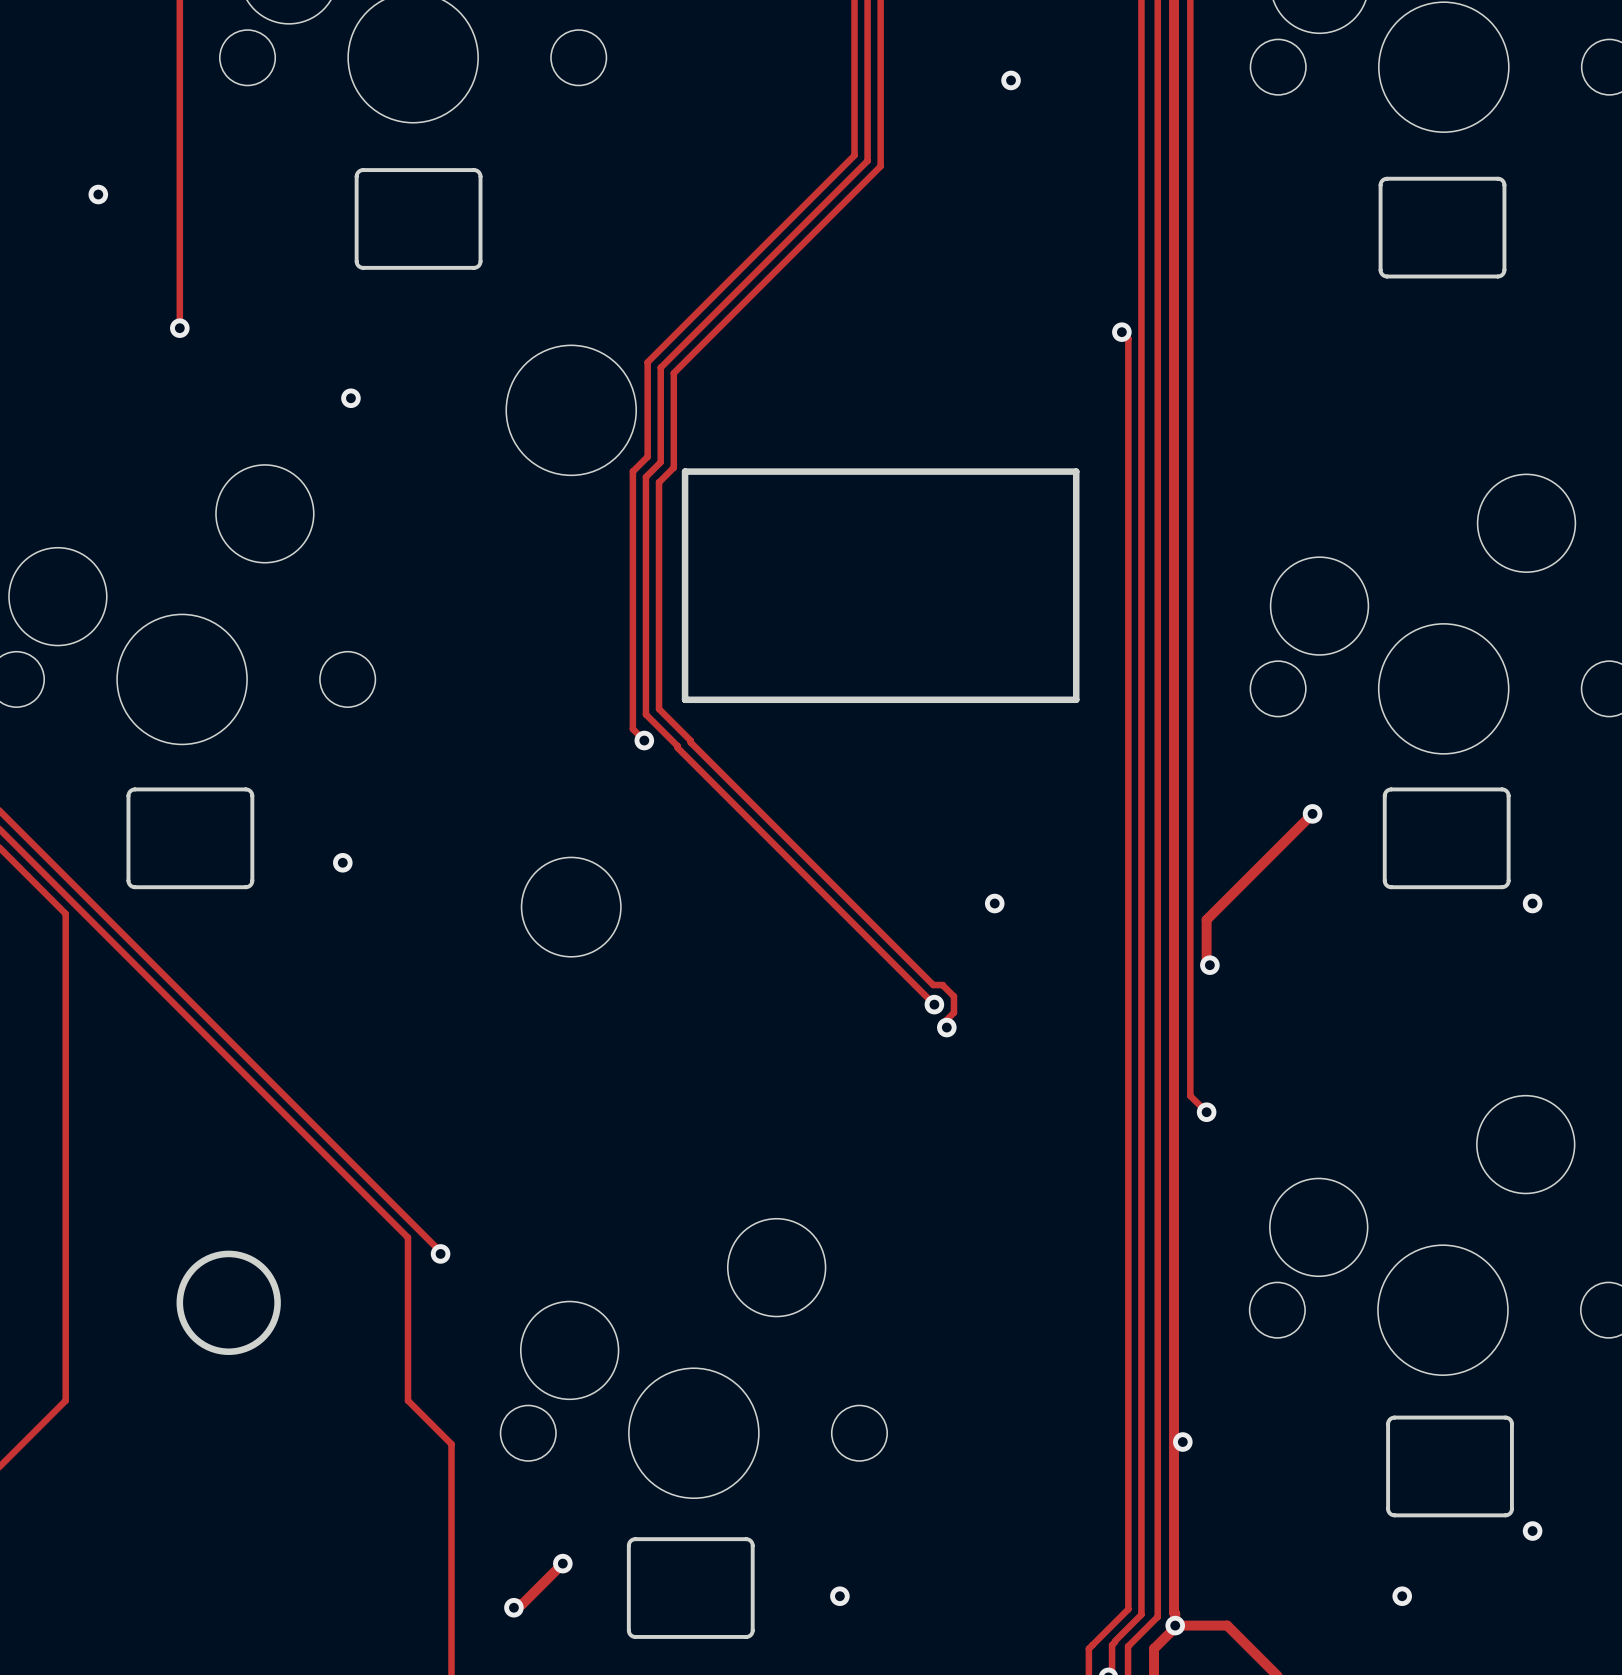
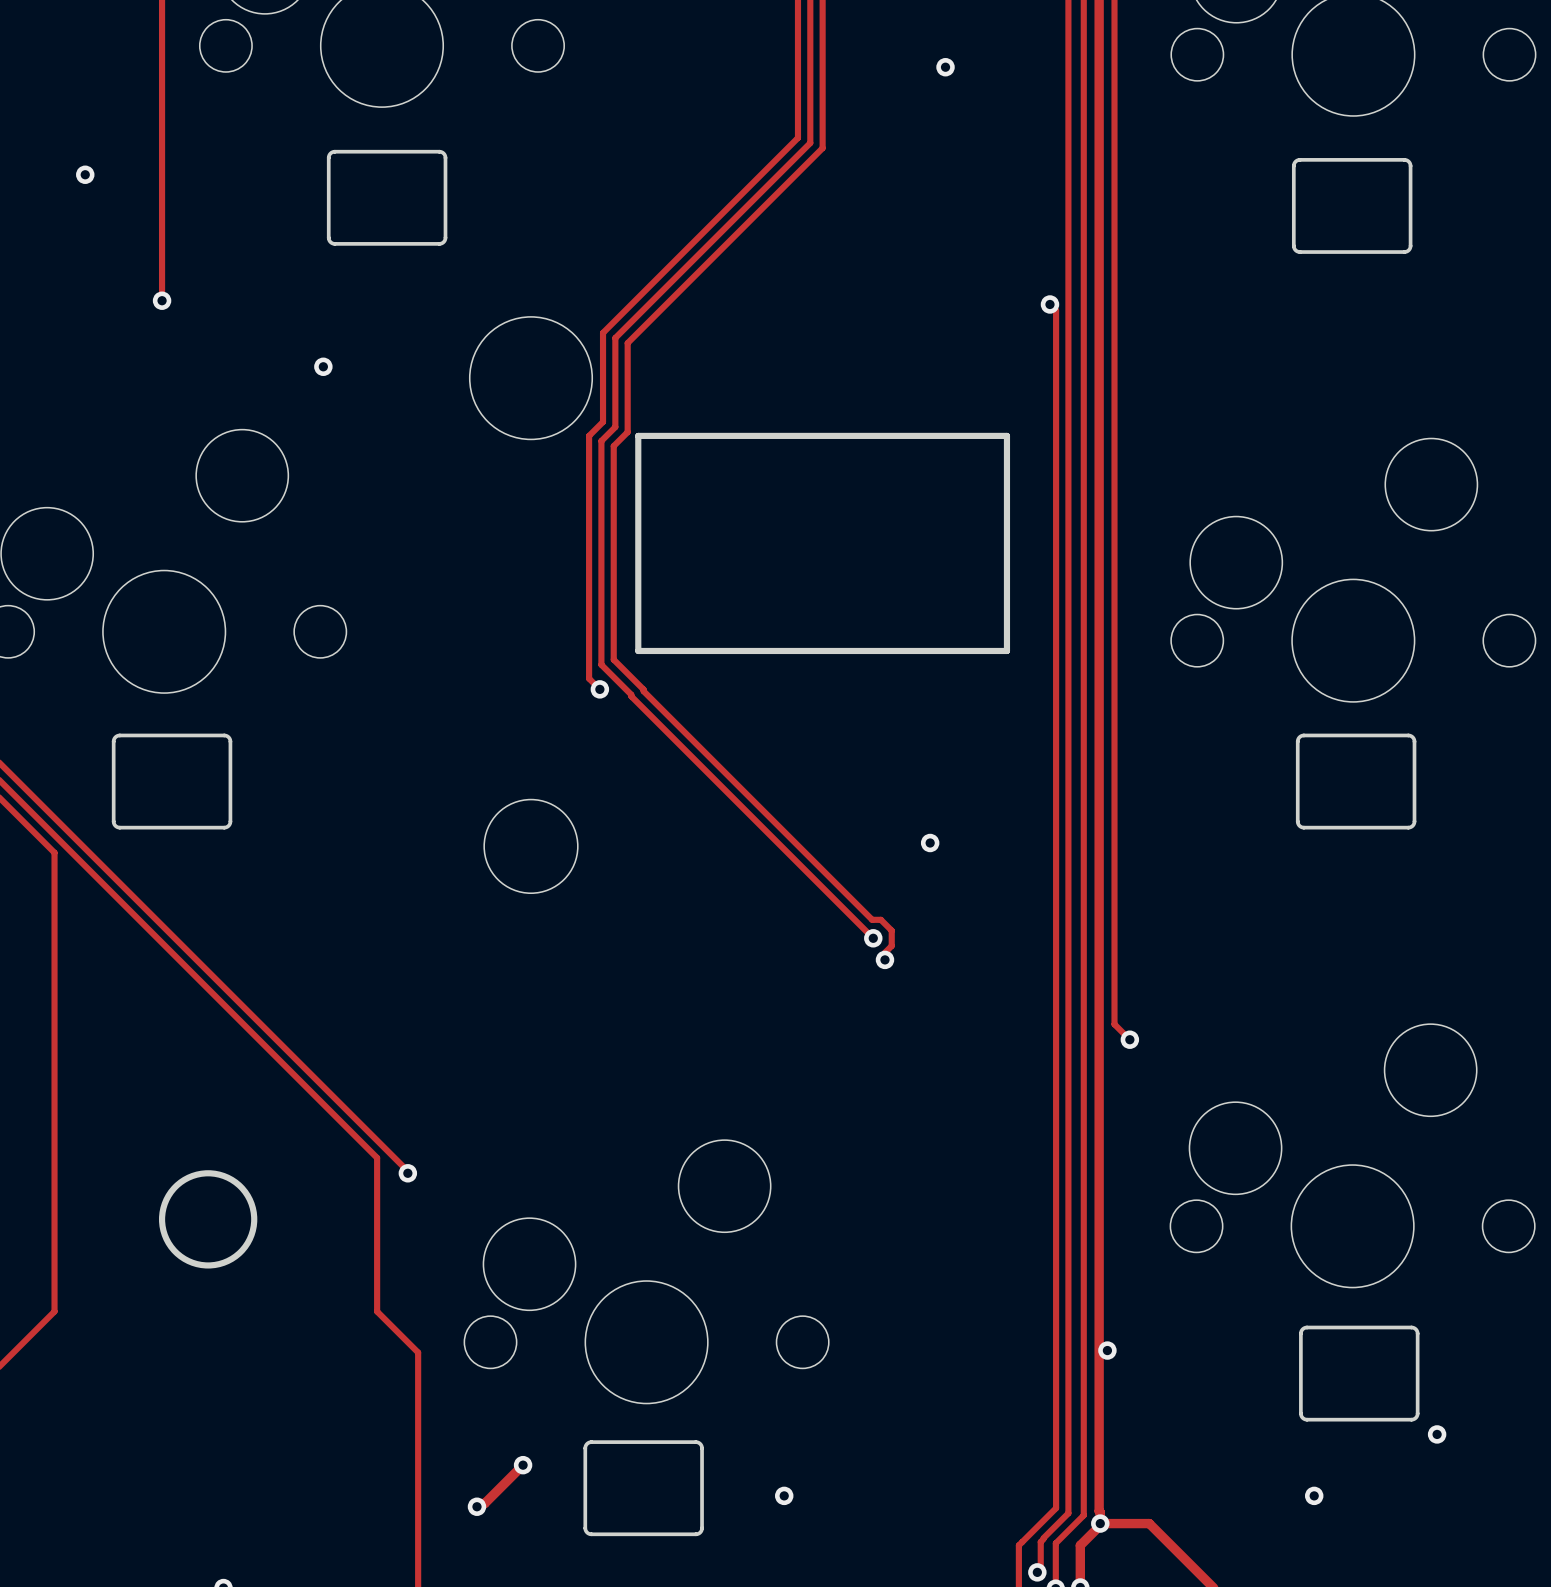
track: (1312, 813) (1206, 919) (1206, 961) (1209, 965) -> none
via: (1312, 813) -> none
via: (342, 862) -> none
via: (1532, 903) -> none
via: (1209, 965) -> none

